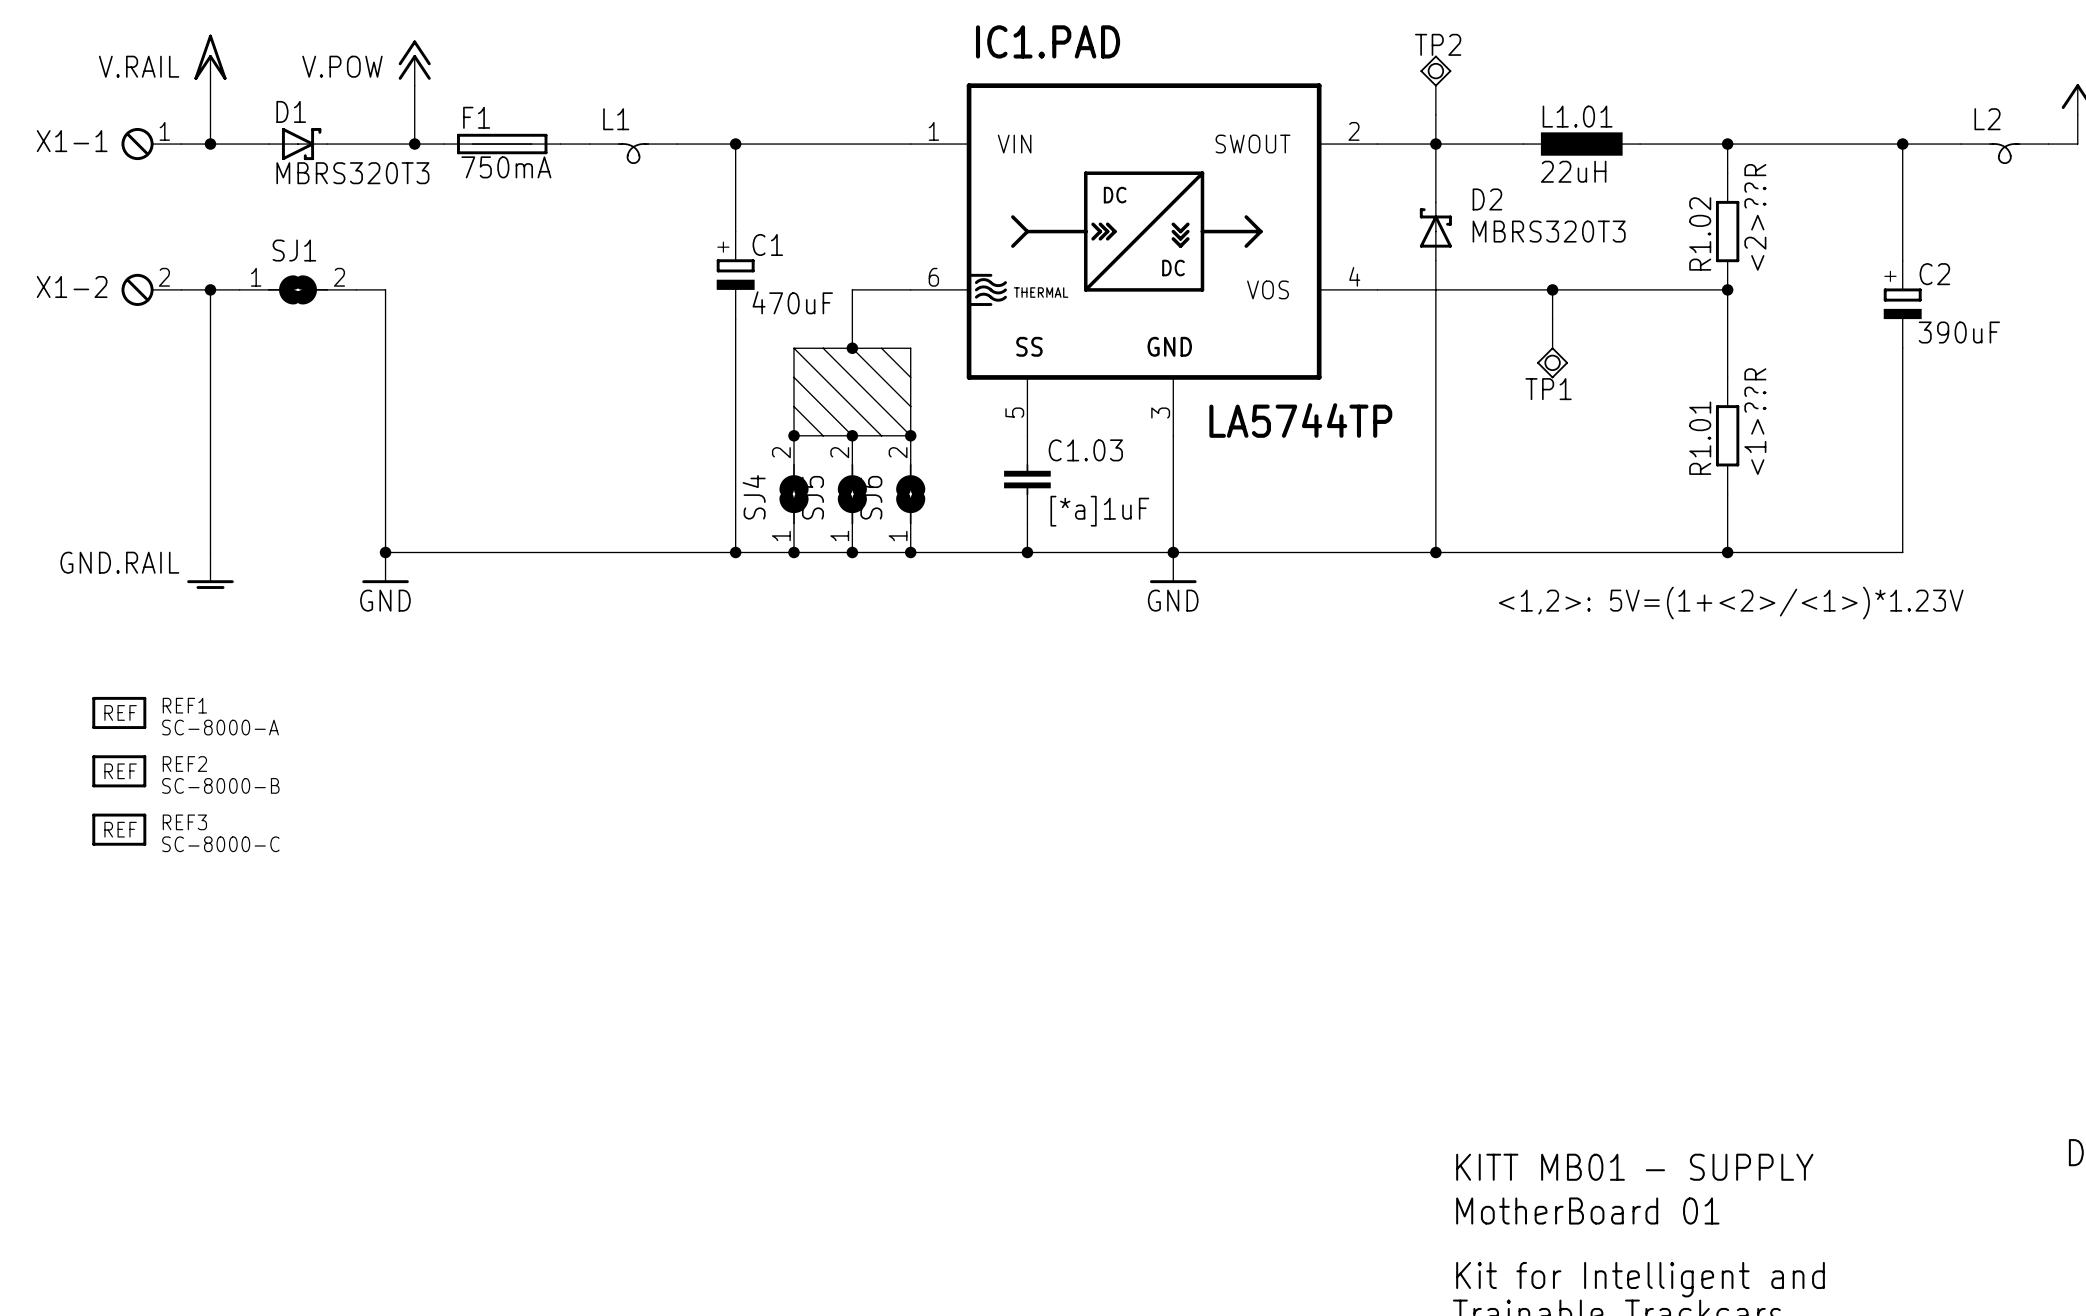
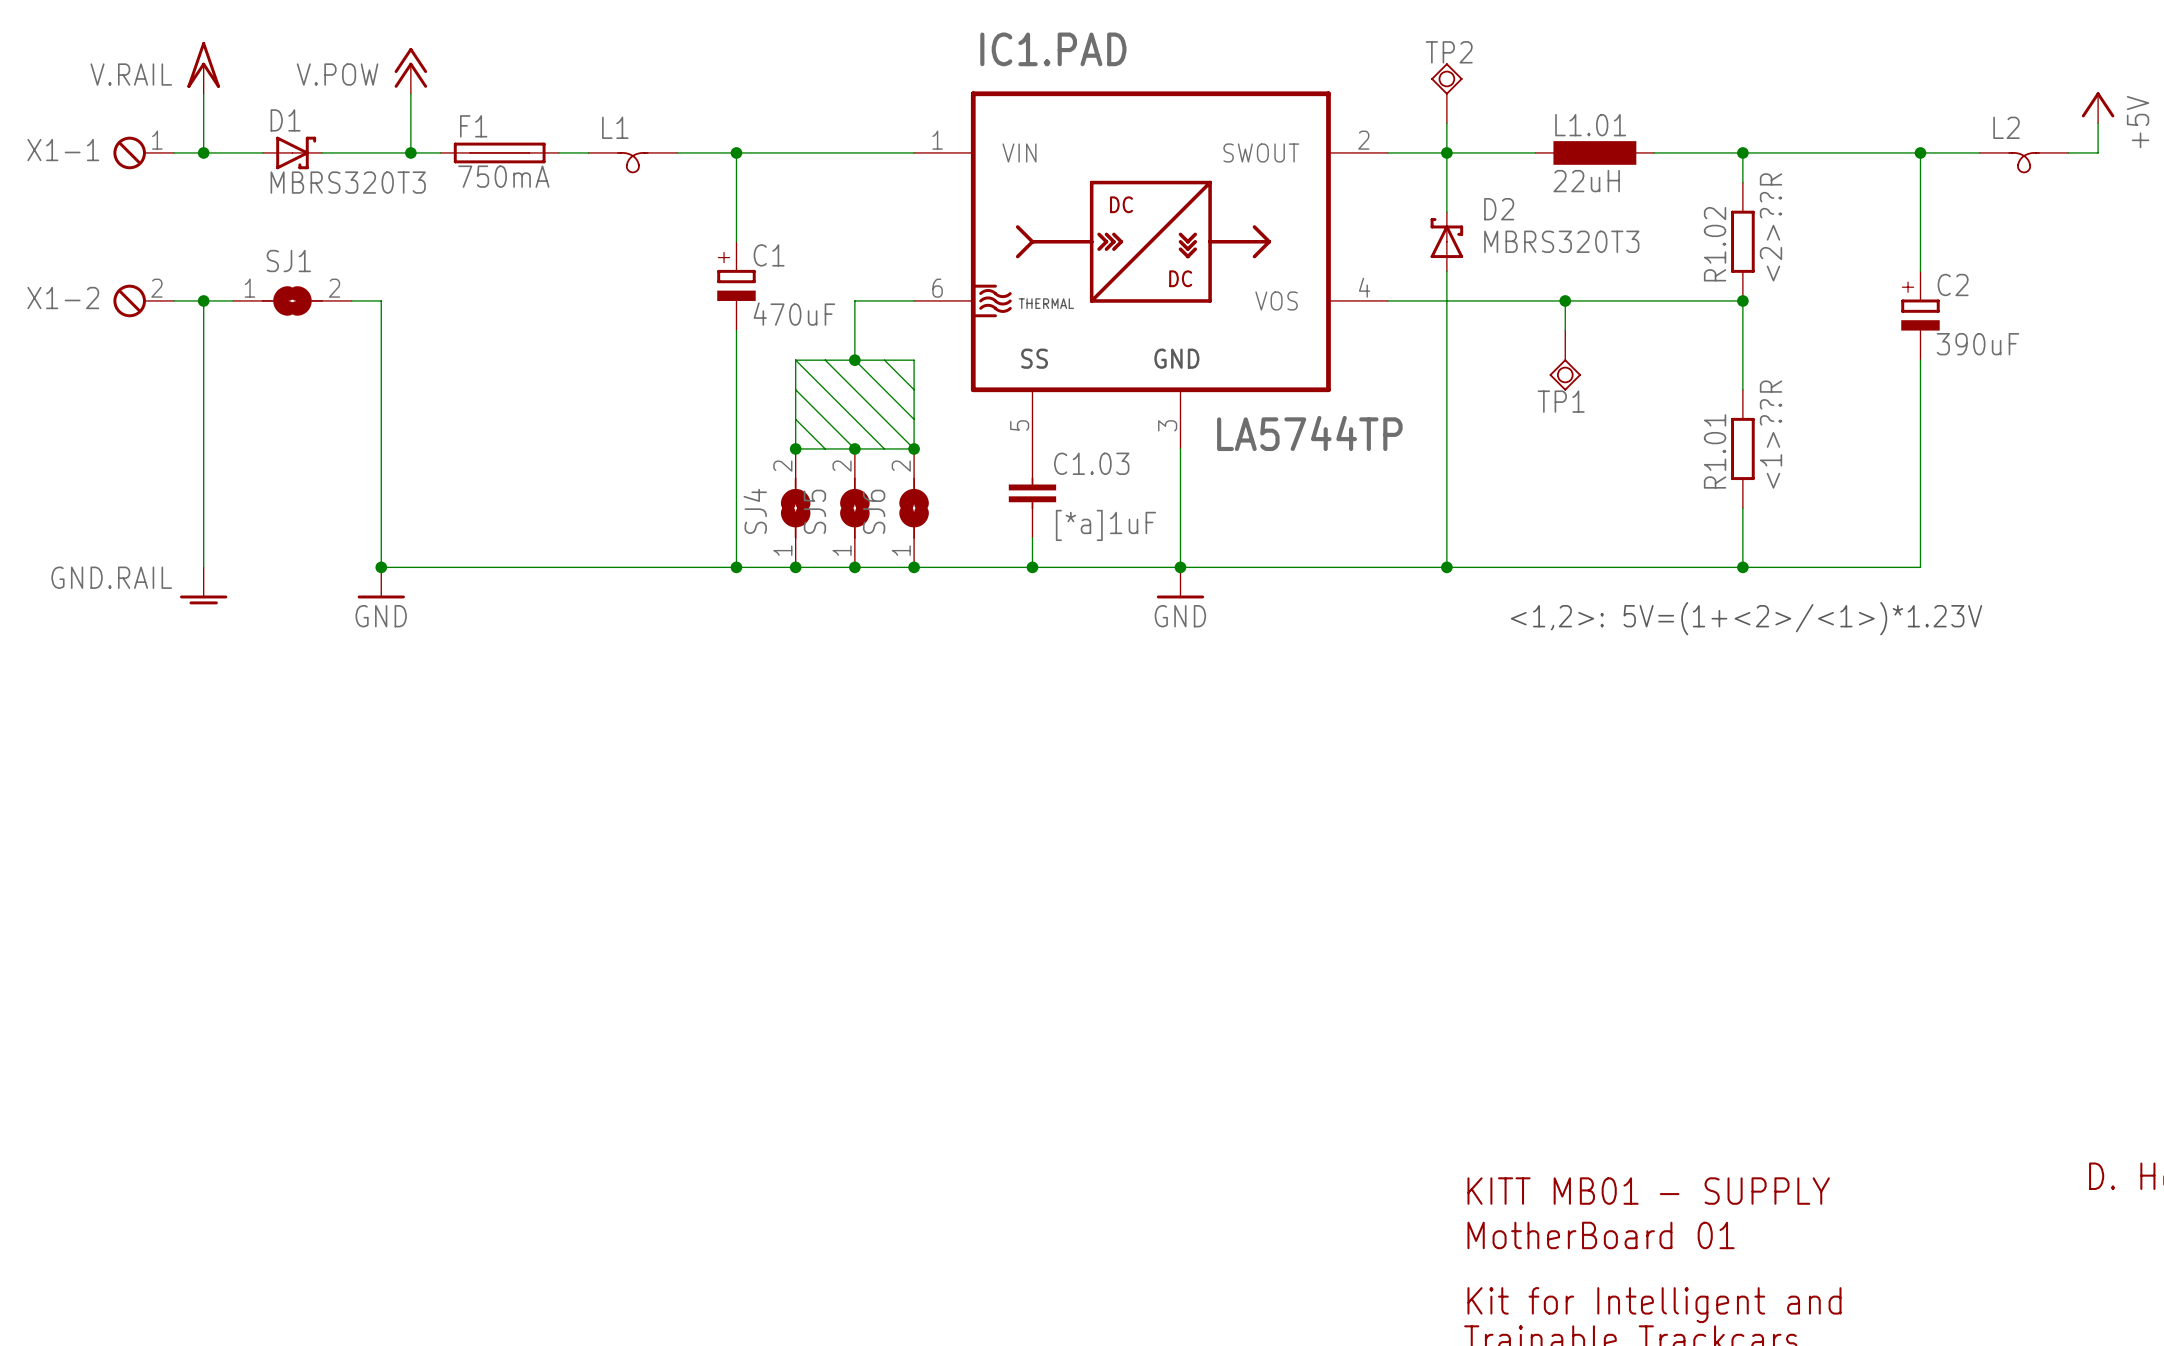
REF1: SC-8000-A (119, 712) -> none
REF2: SC-8000-B (119, 771) -> none
REF3: SC-8000-C (119, 829) -> none

